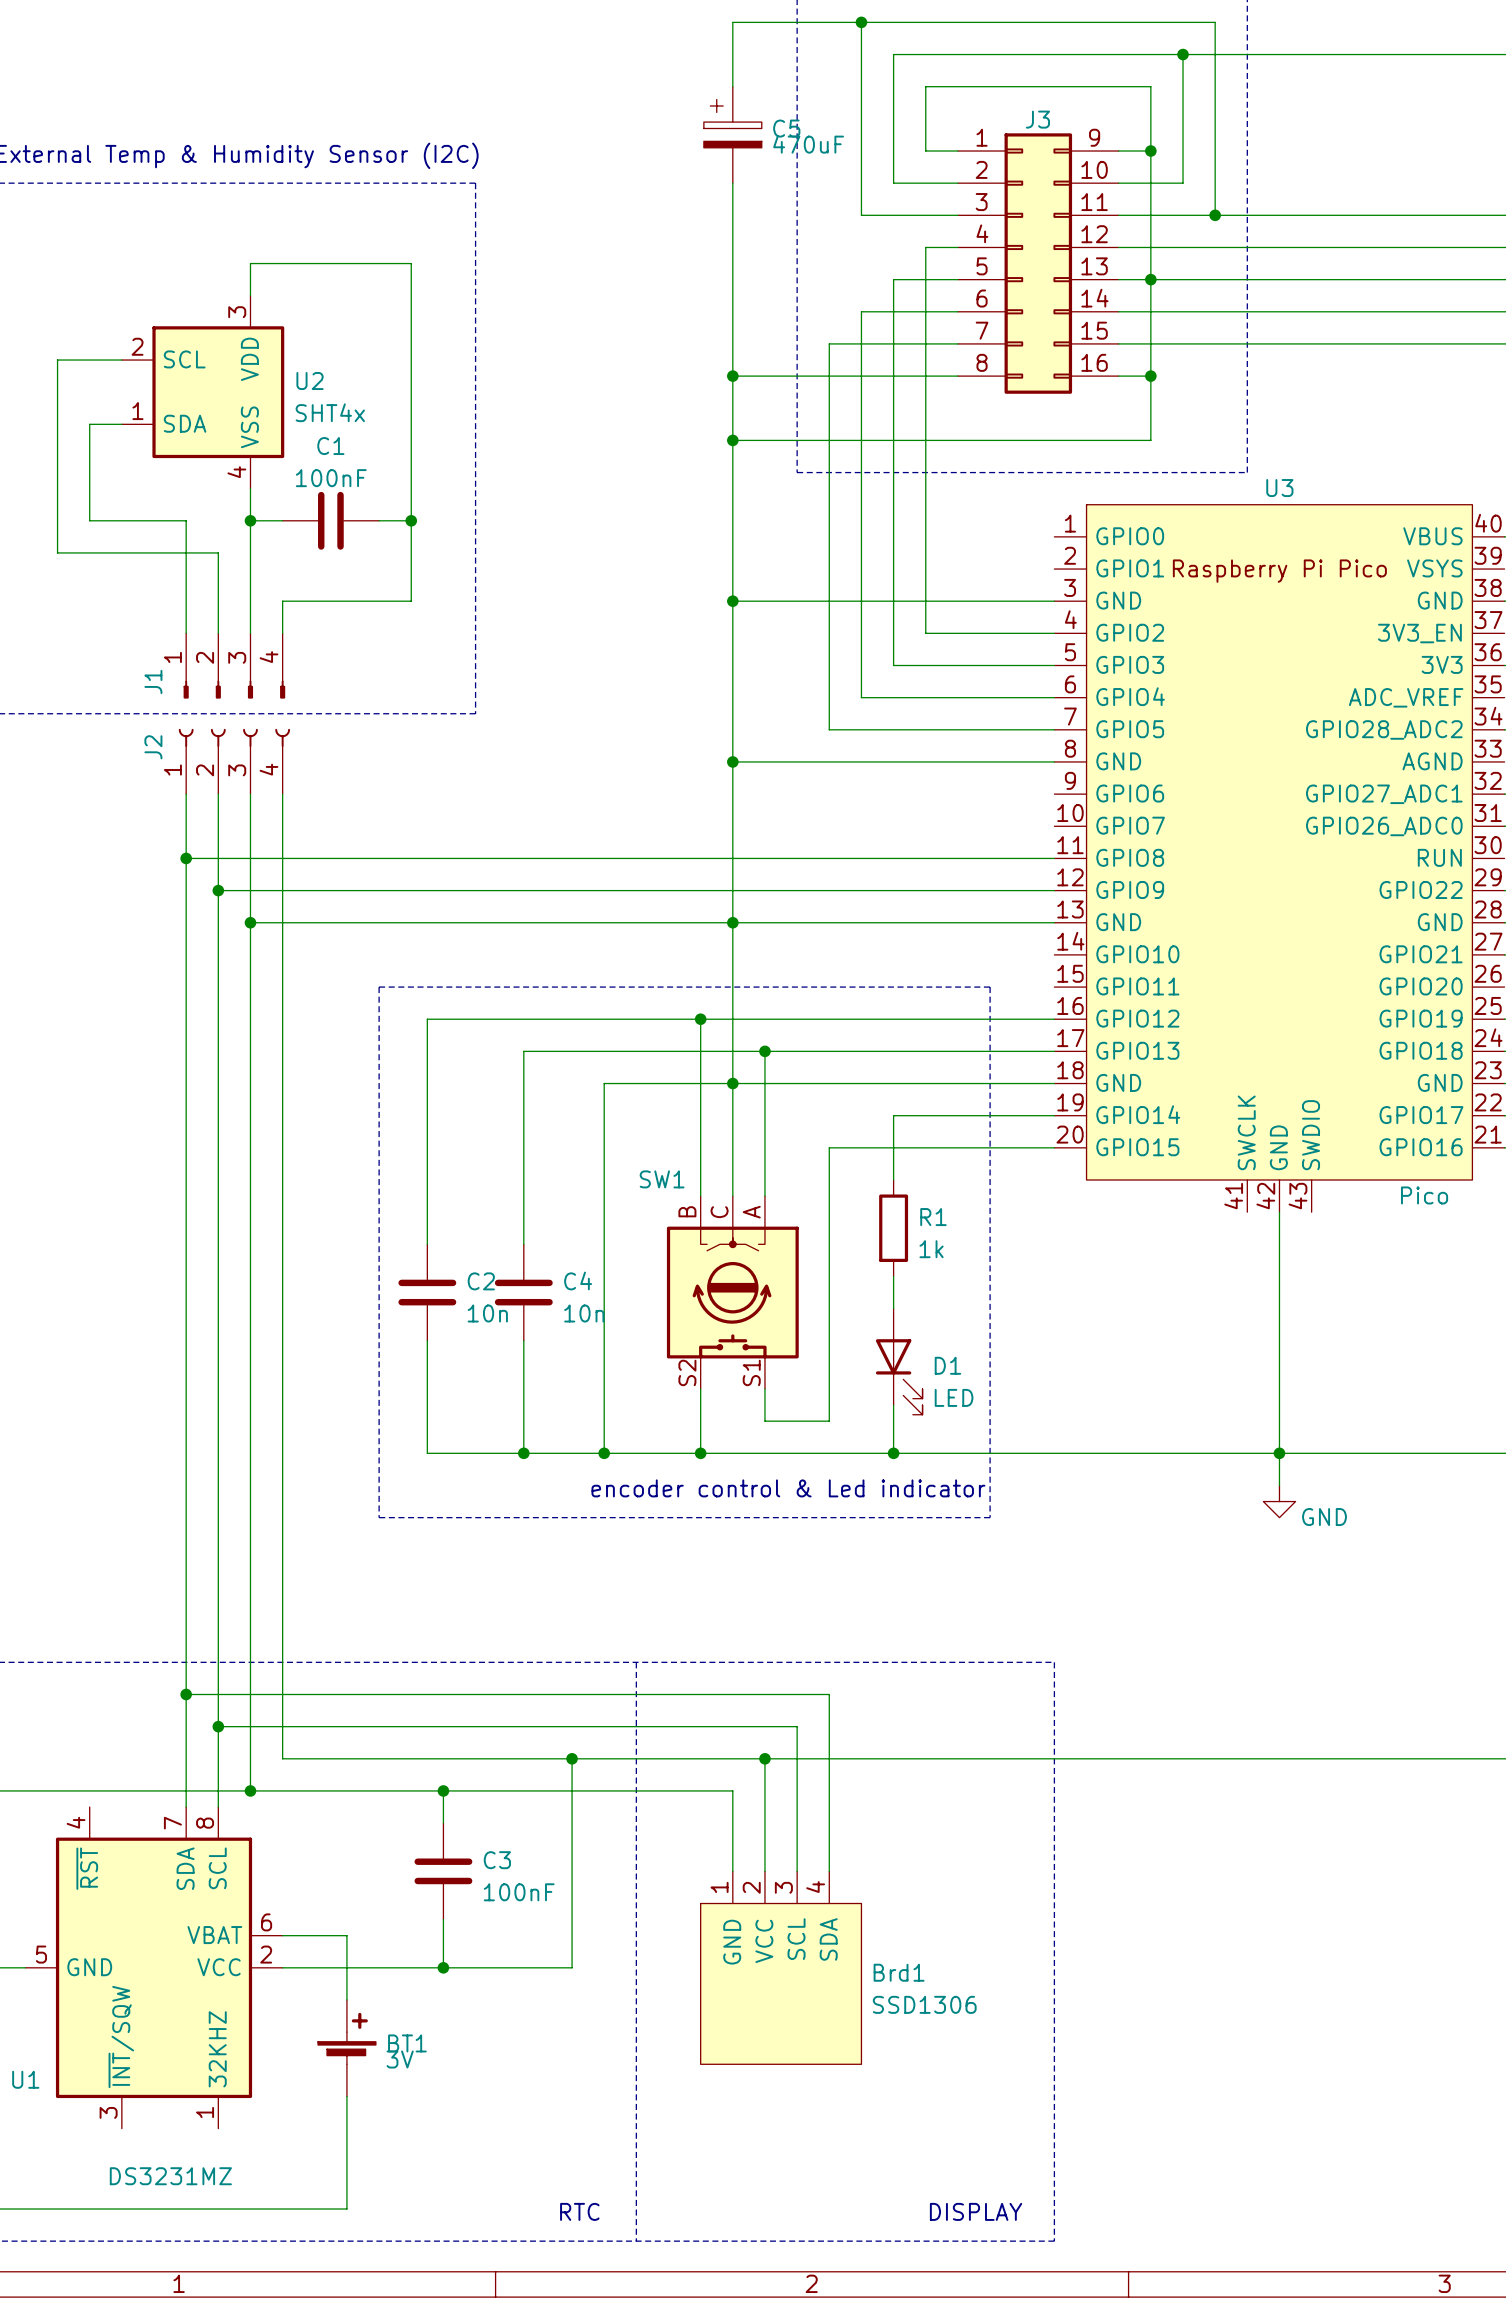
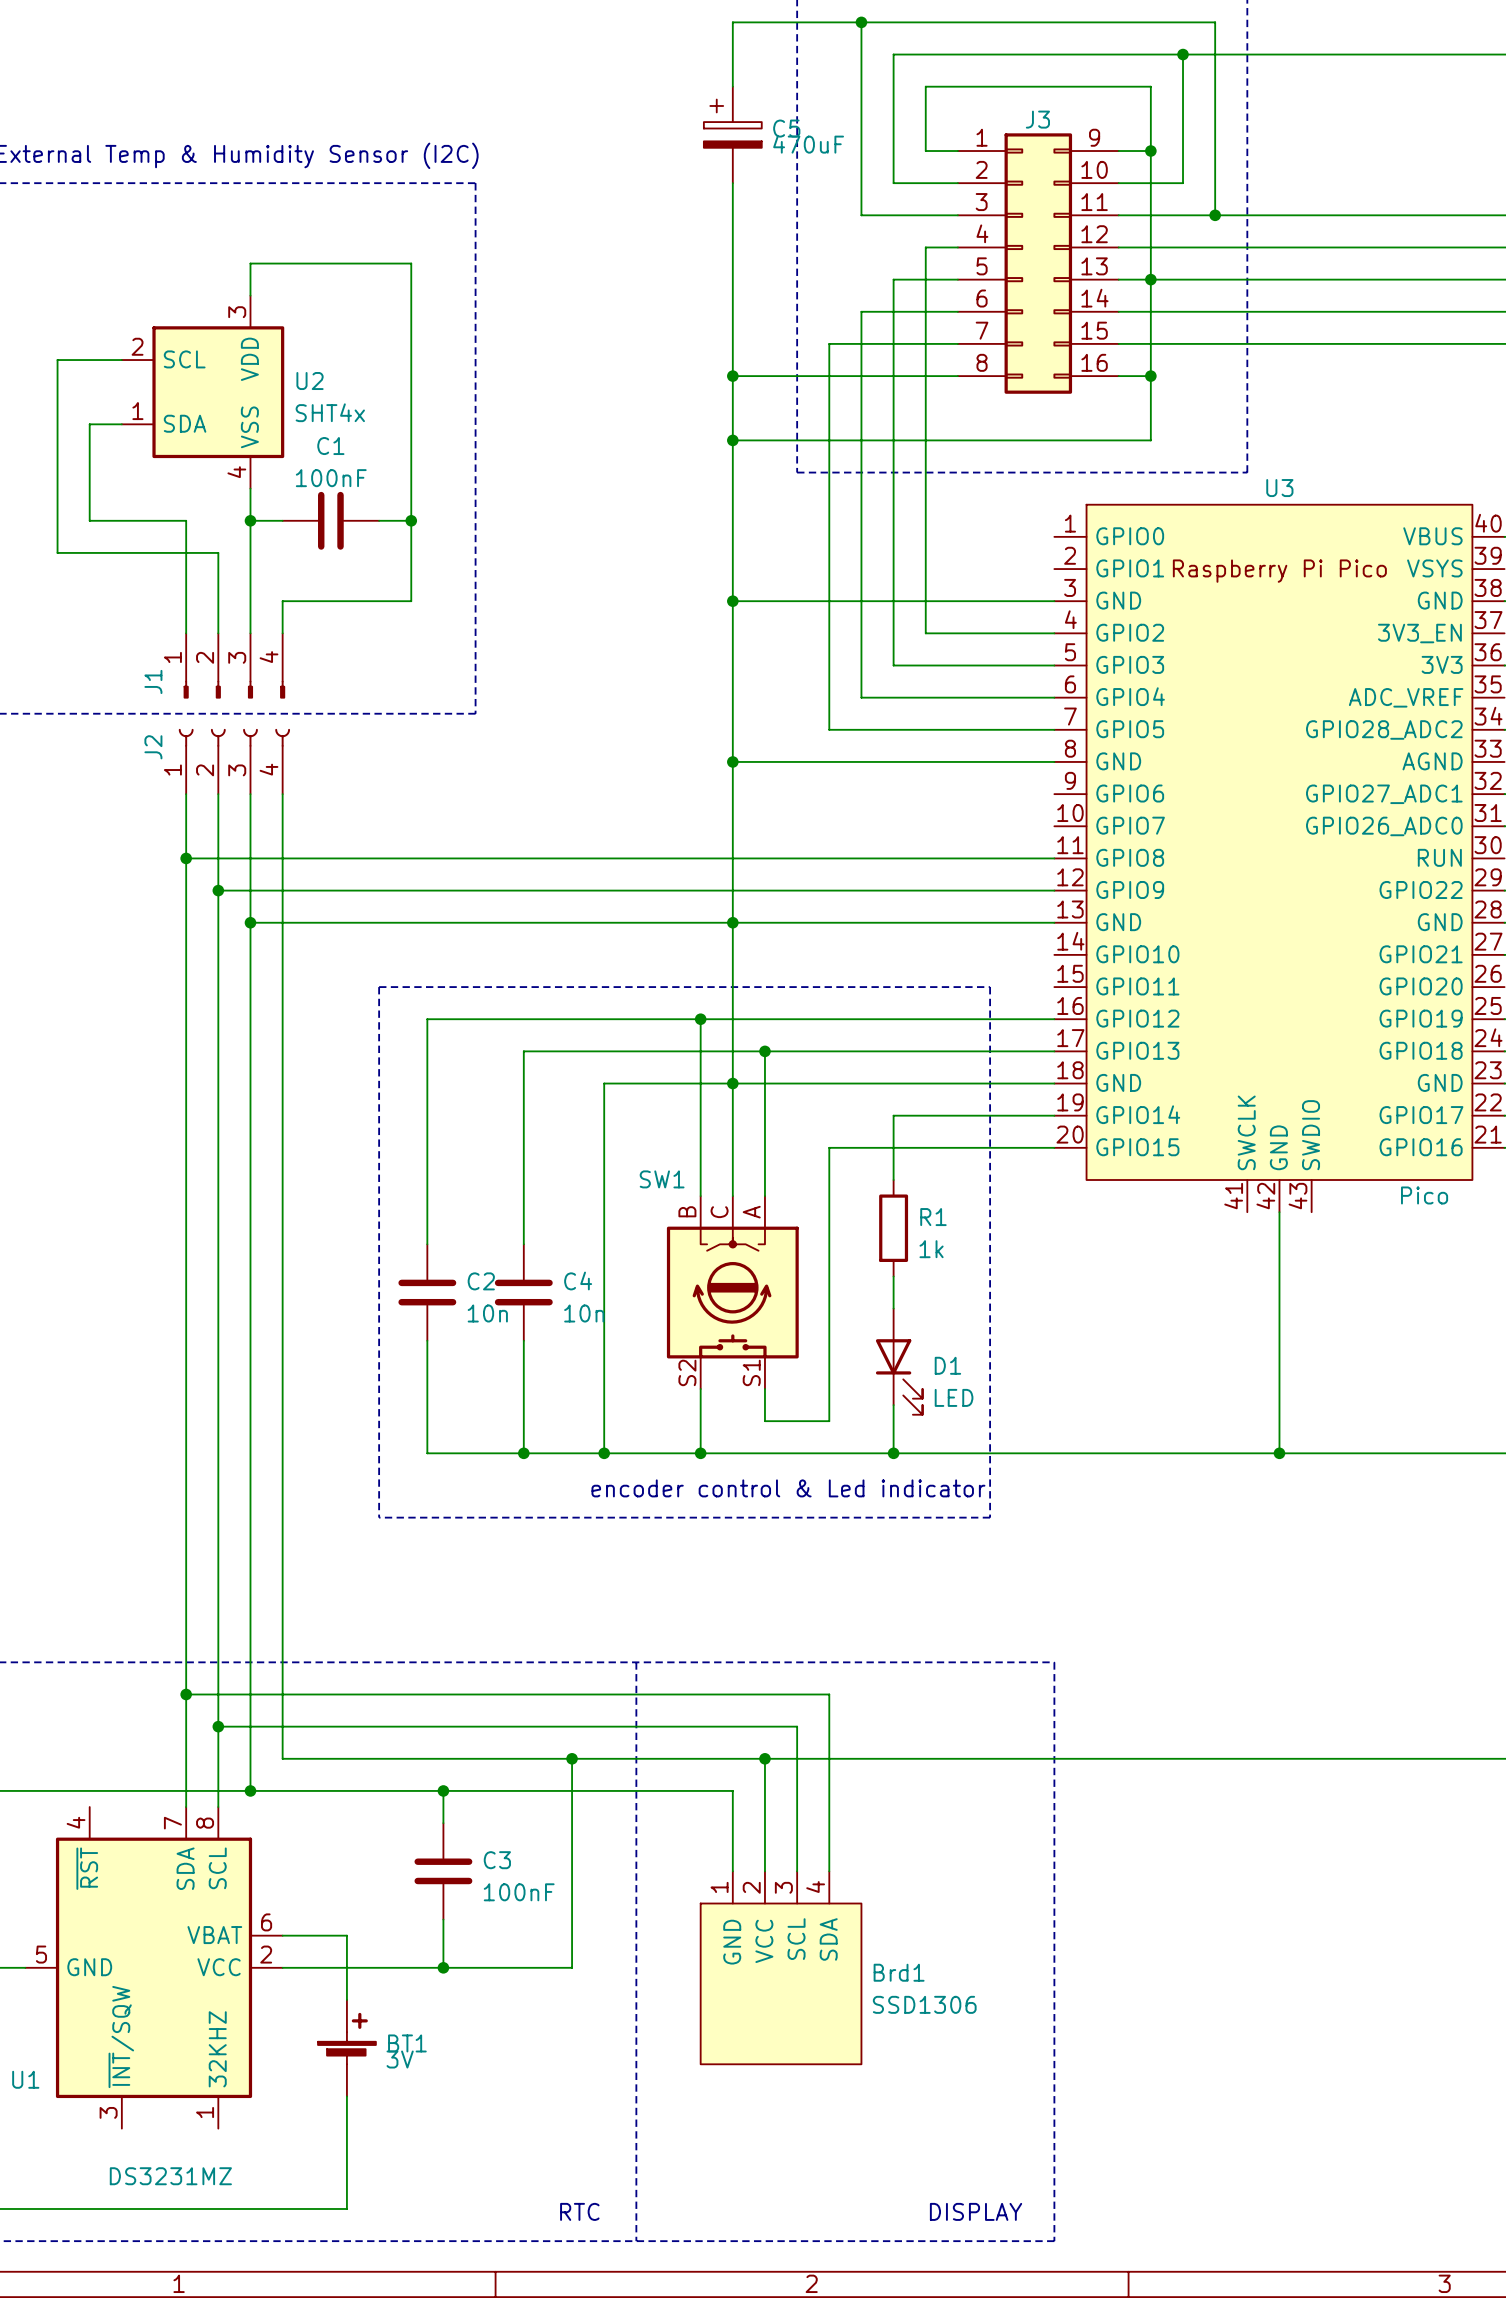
wire: (1279, 1453) (1279, 1485) -> none
power symbol: GND (1279, 1501) -> none

